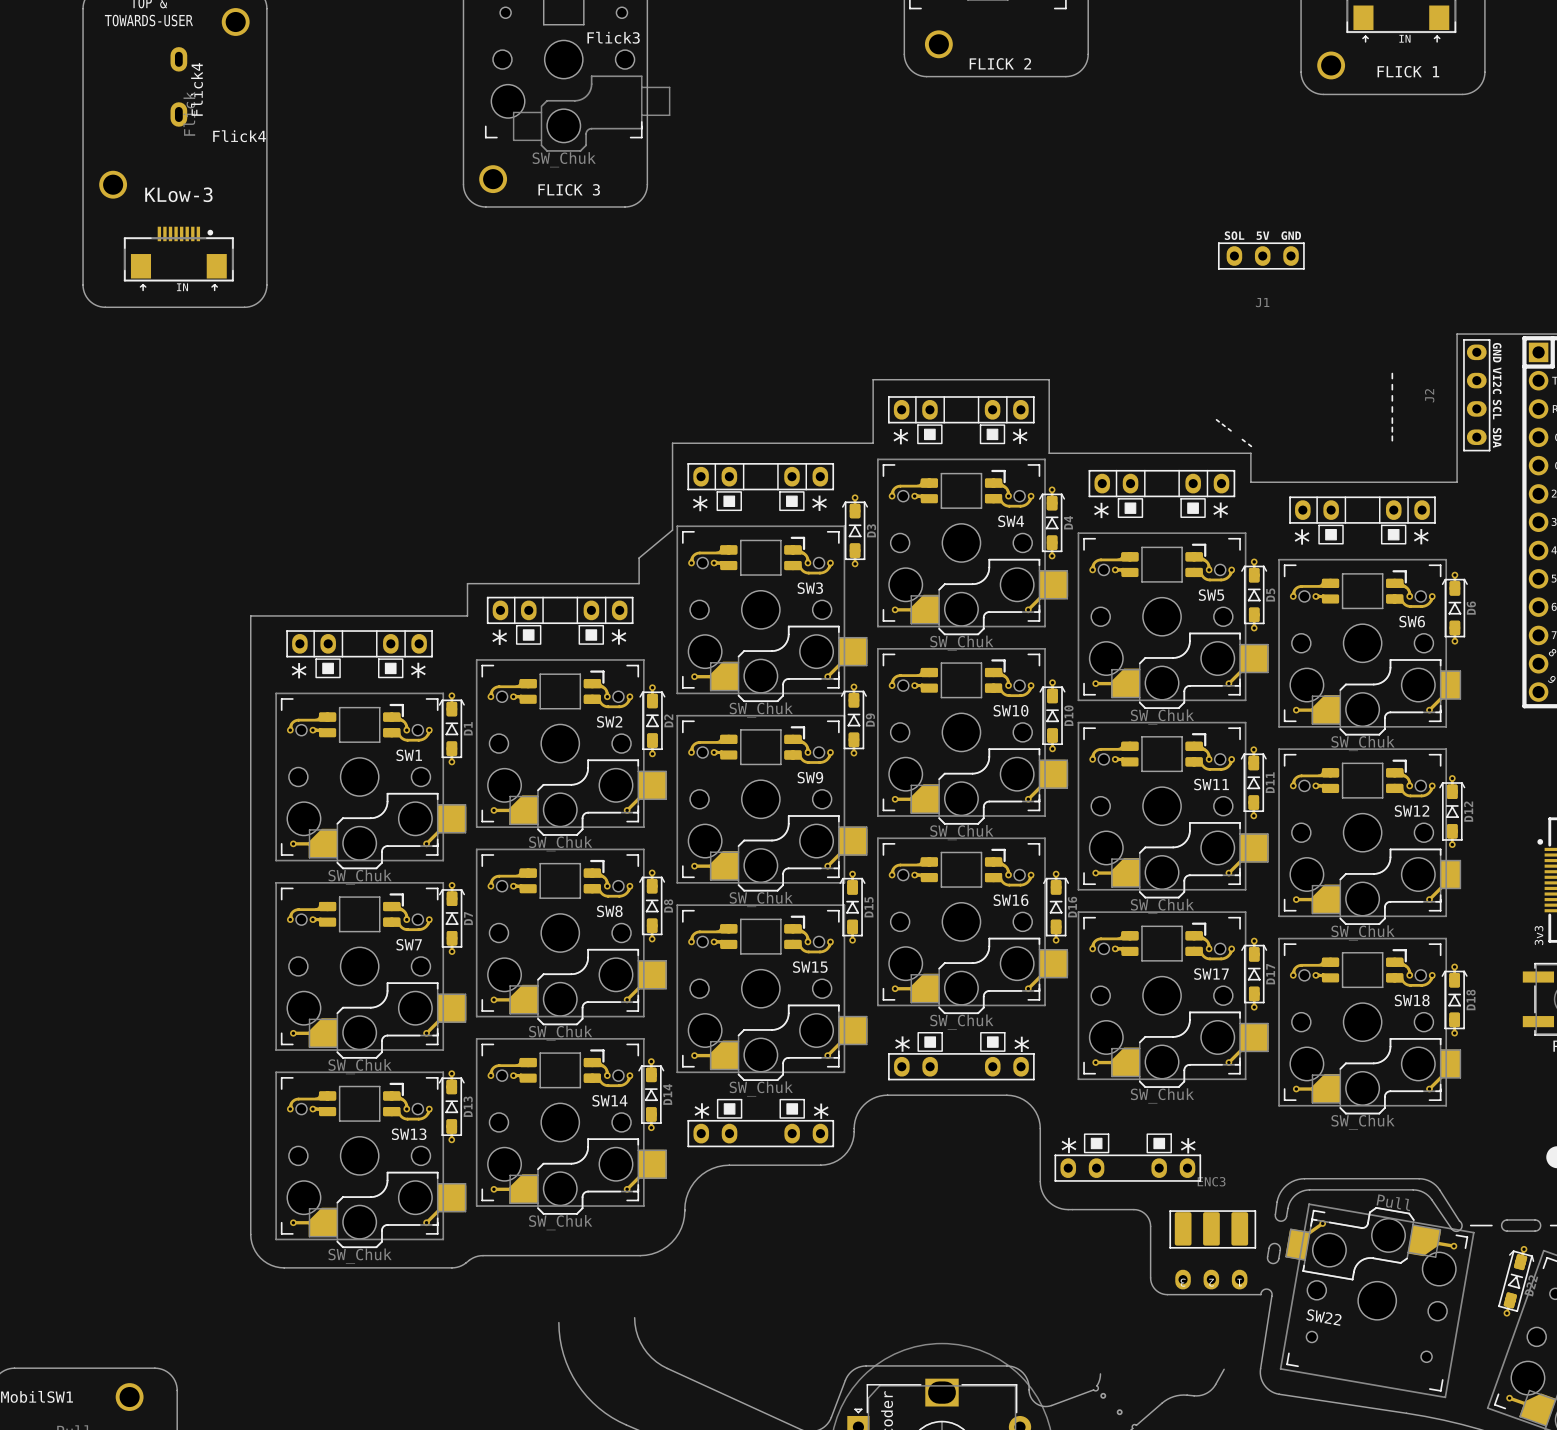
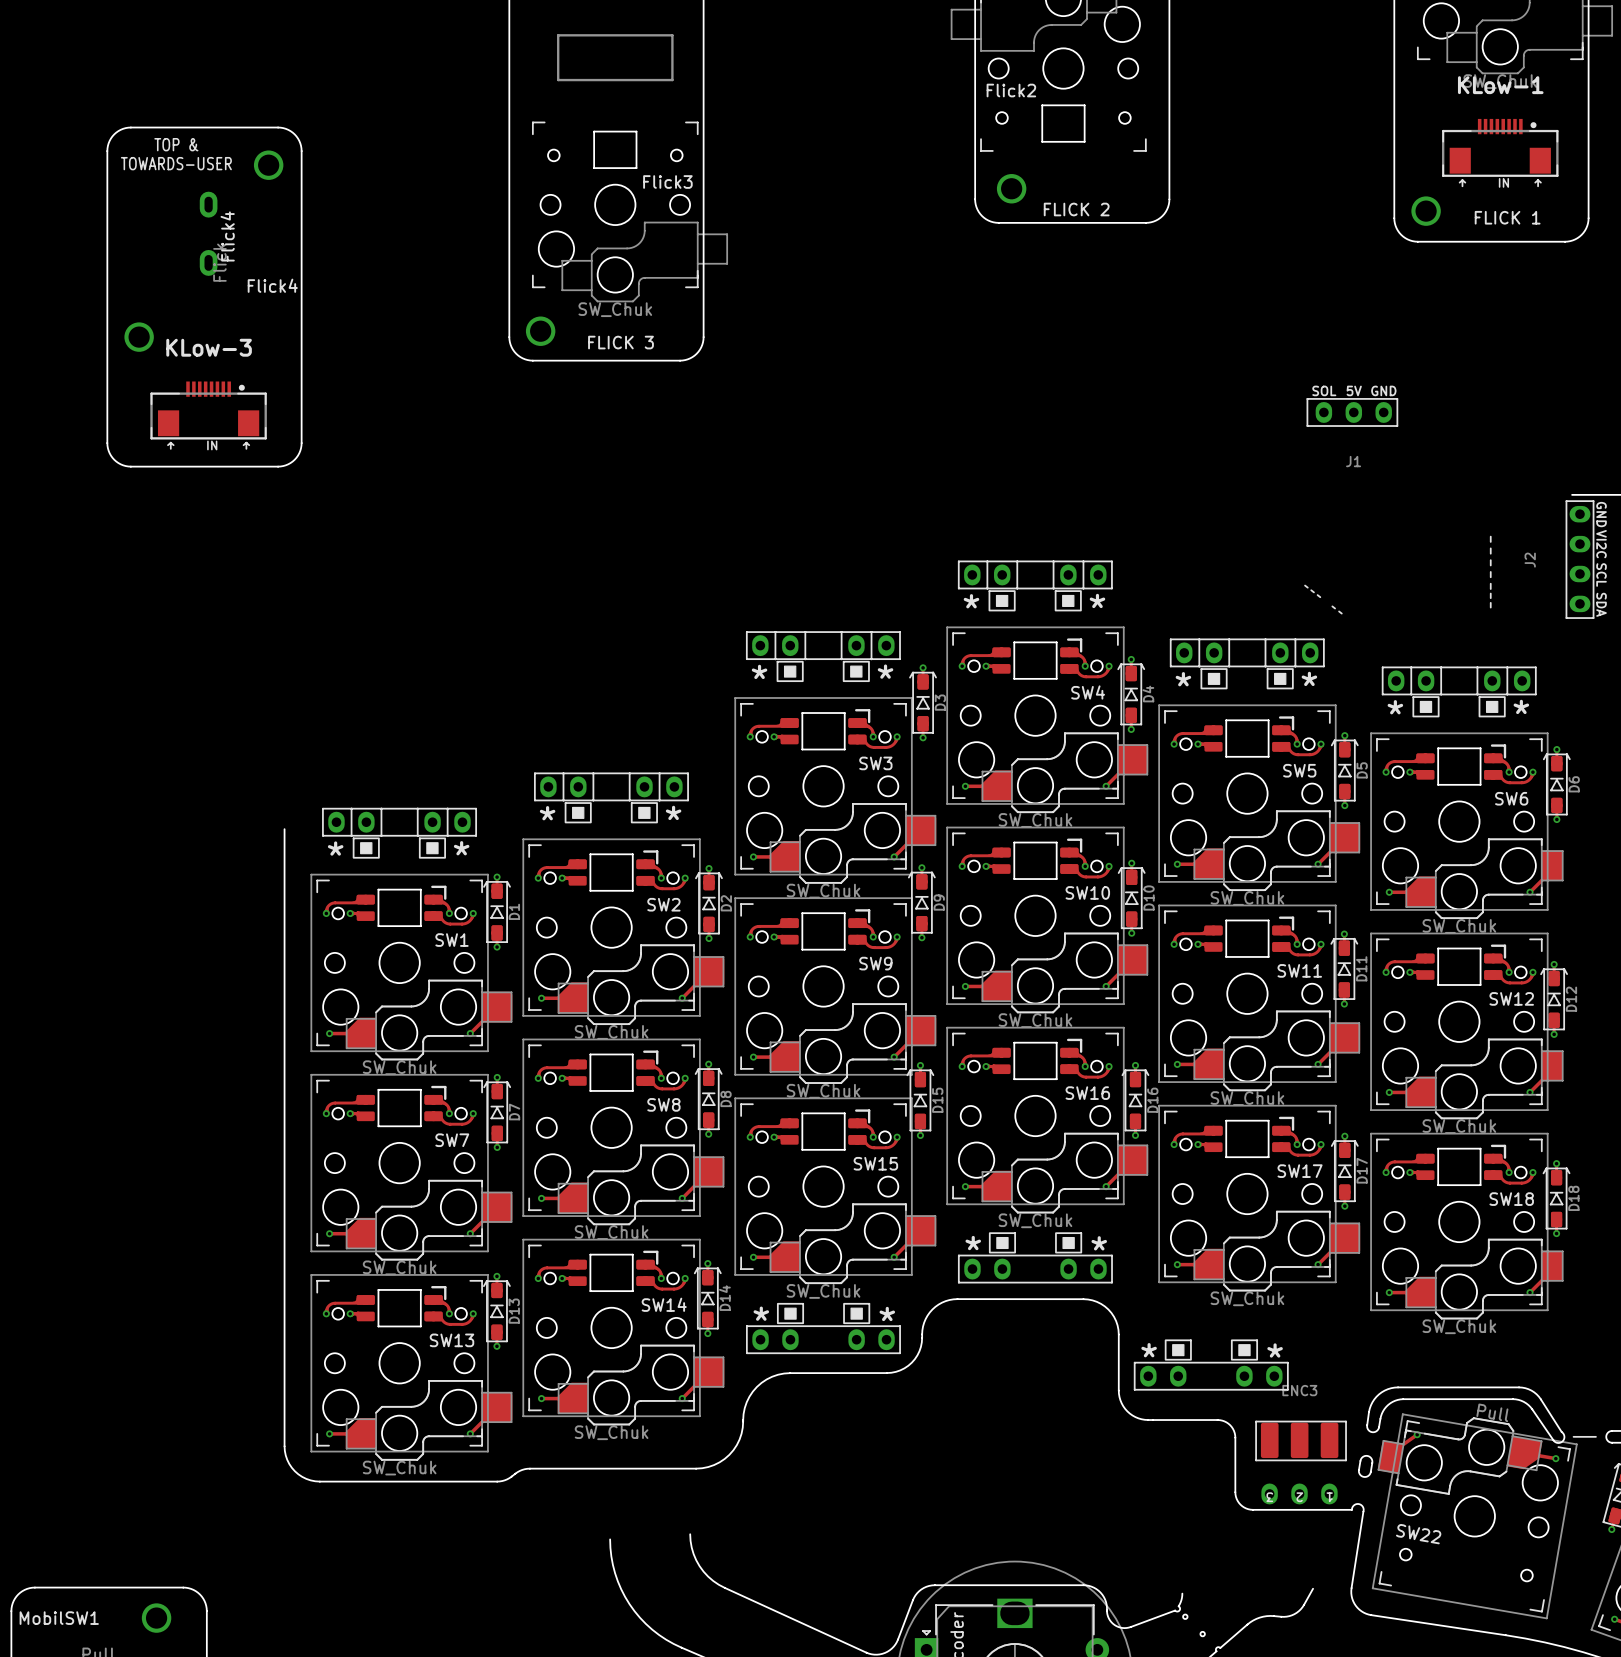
board edge: (1469, 334) (1457, 334) (1457, 482) (1250, 482) (1250, 453) (1049, 453) (1049, 379) (873, 379) (873, 443) (672, 443) (672, 530) (639, 558) (639, 583) (467, 583) (467, 615) (250, 615) (250, 650) -> none

